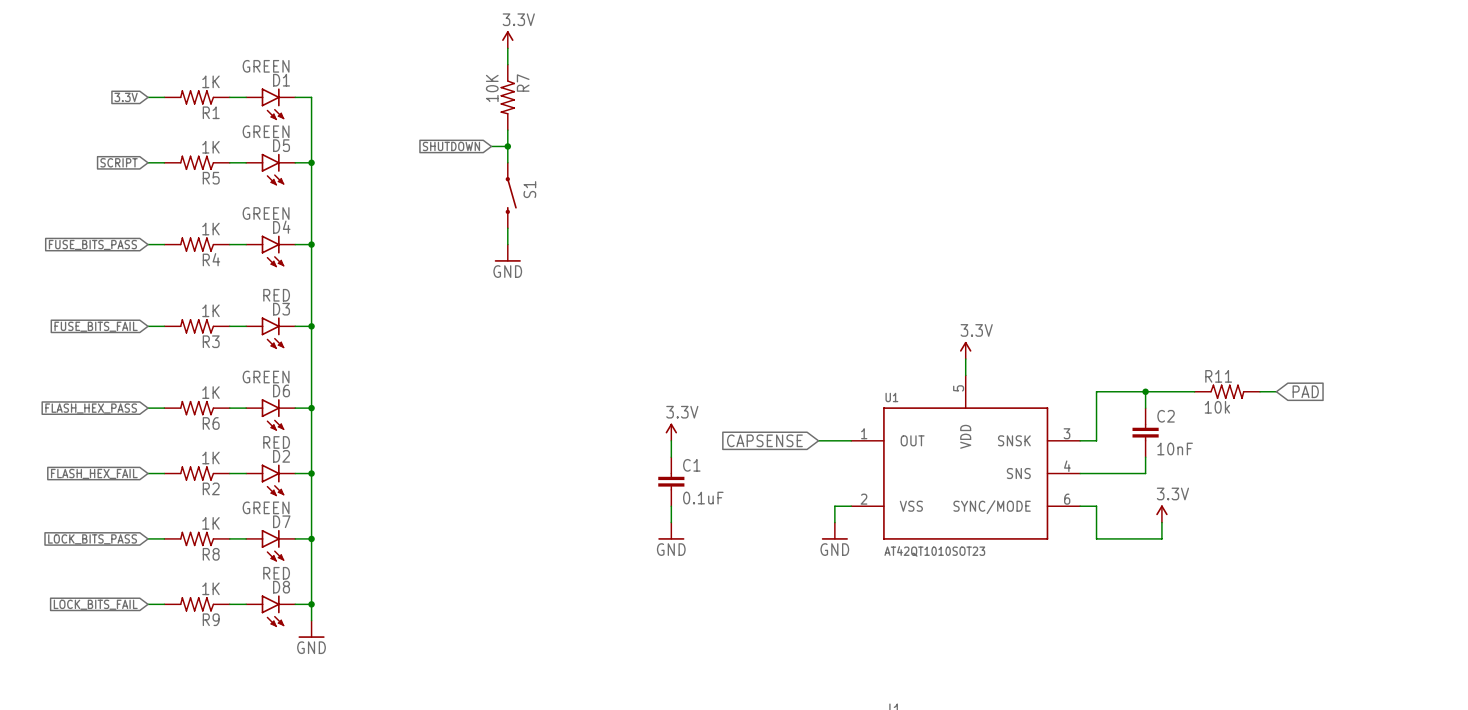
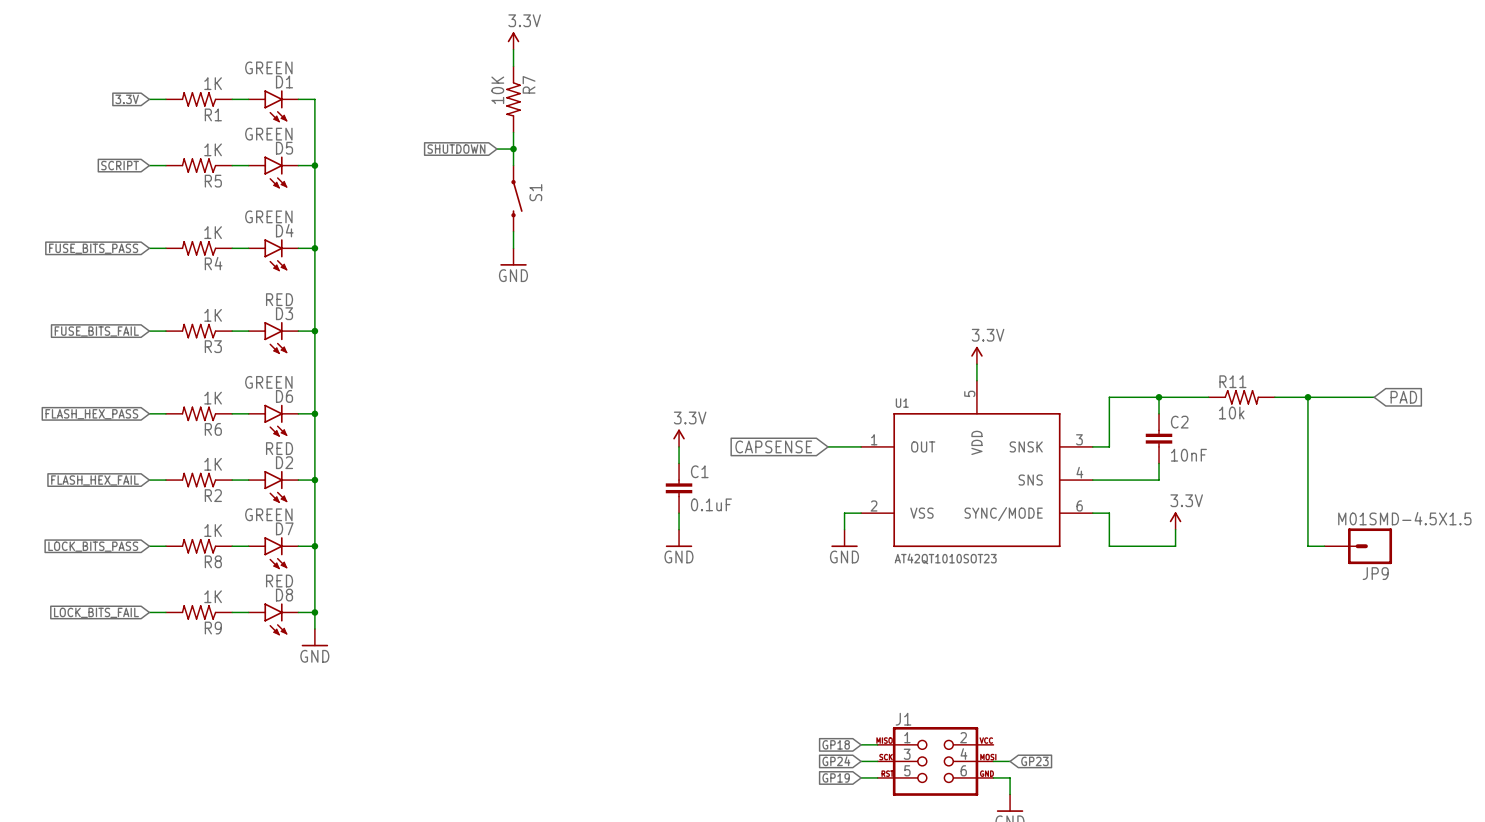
wire: none -> (1291, 397) (1374, 397)
wire: none -> (1307, 397) (1307, 546) (1324, 546)
junction: none -> (1307, 397)
global label position: PAD (1305, 391) -> PAD (1403, 397)
JP9: none -> M01SMD-4.5X1.5 (1358, 546)

